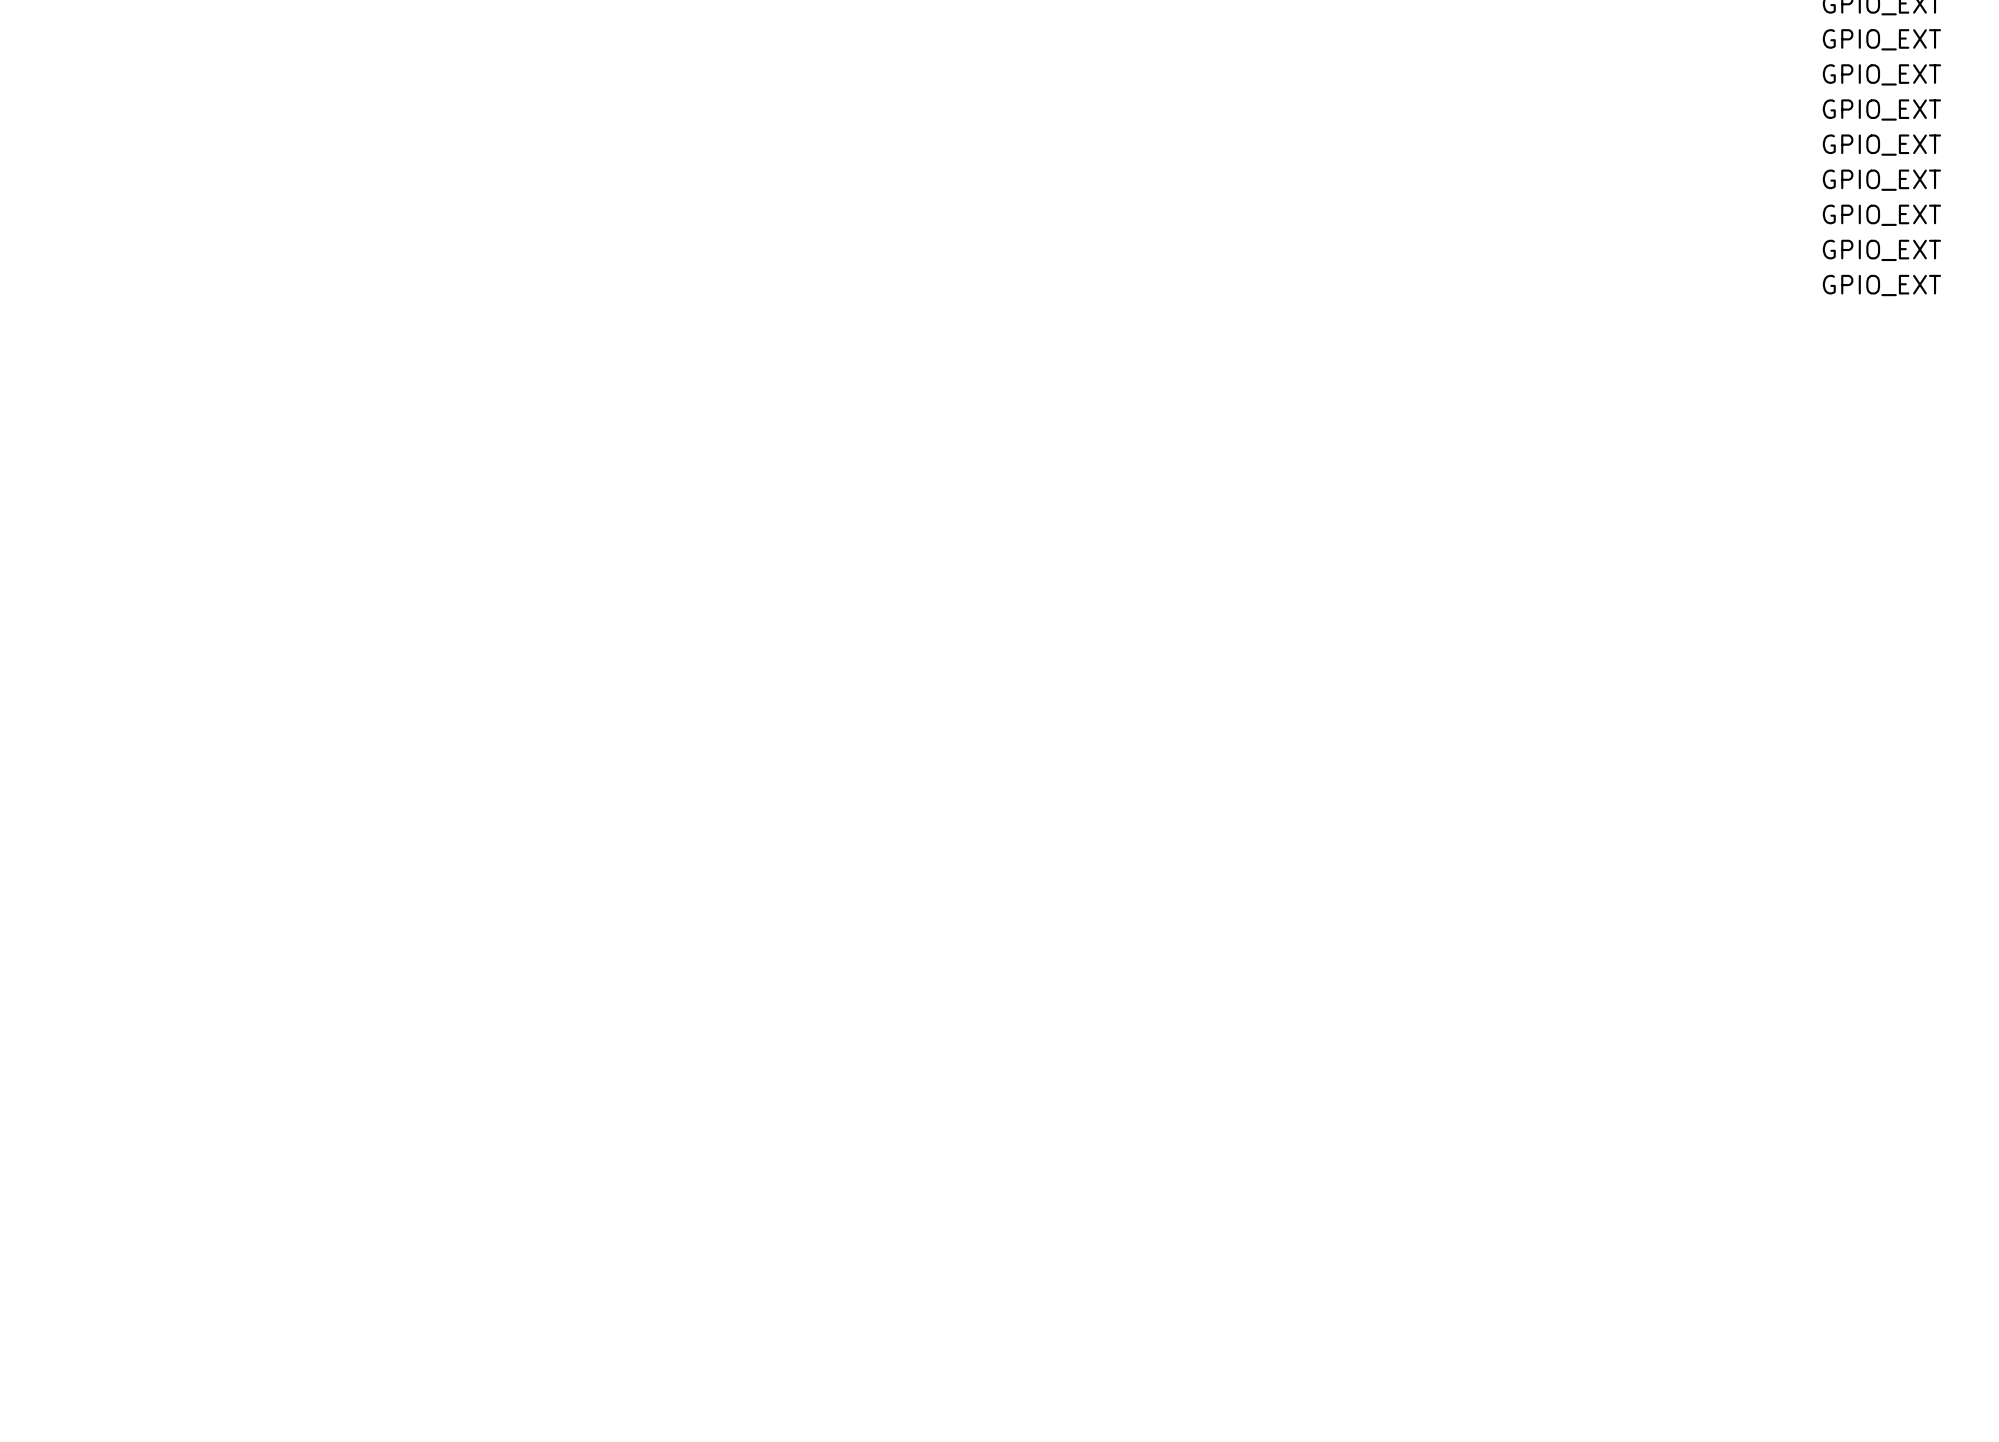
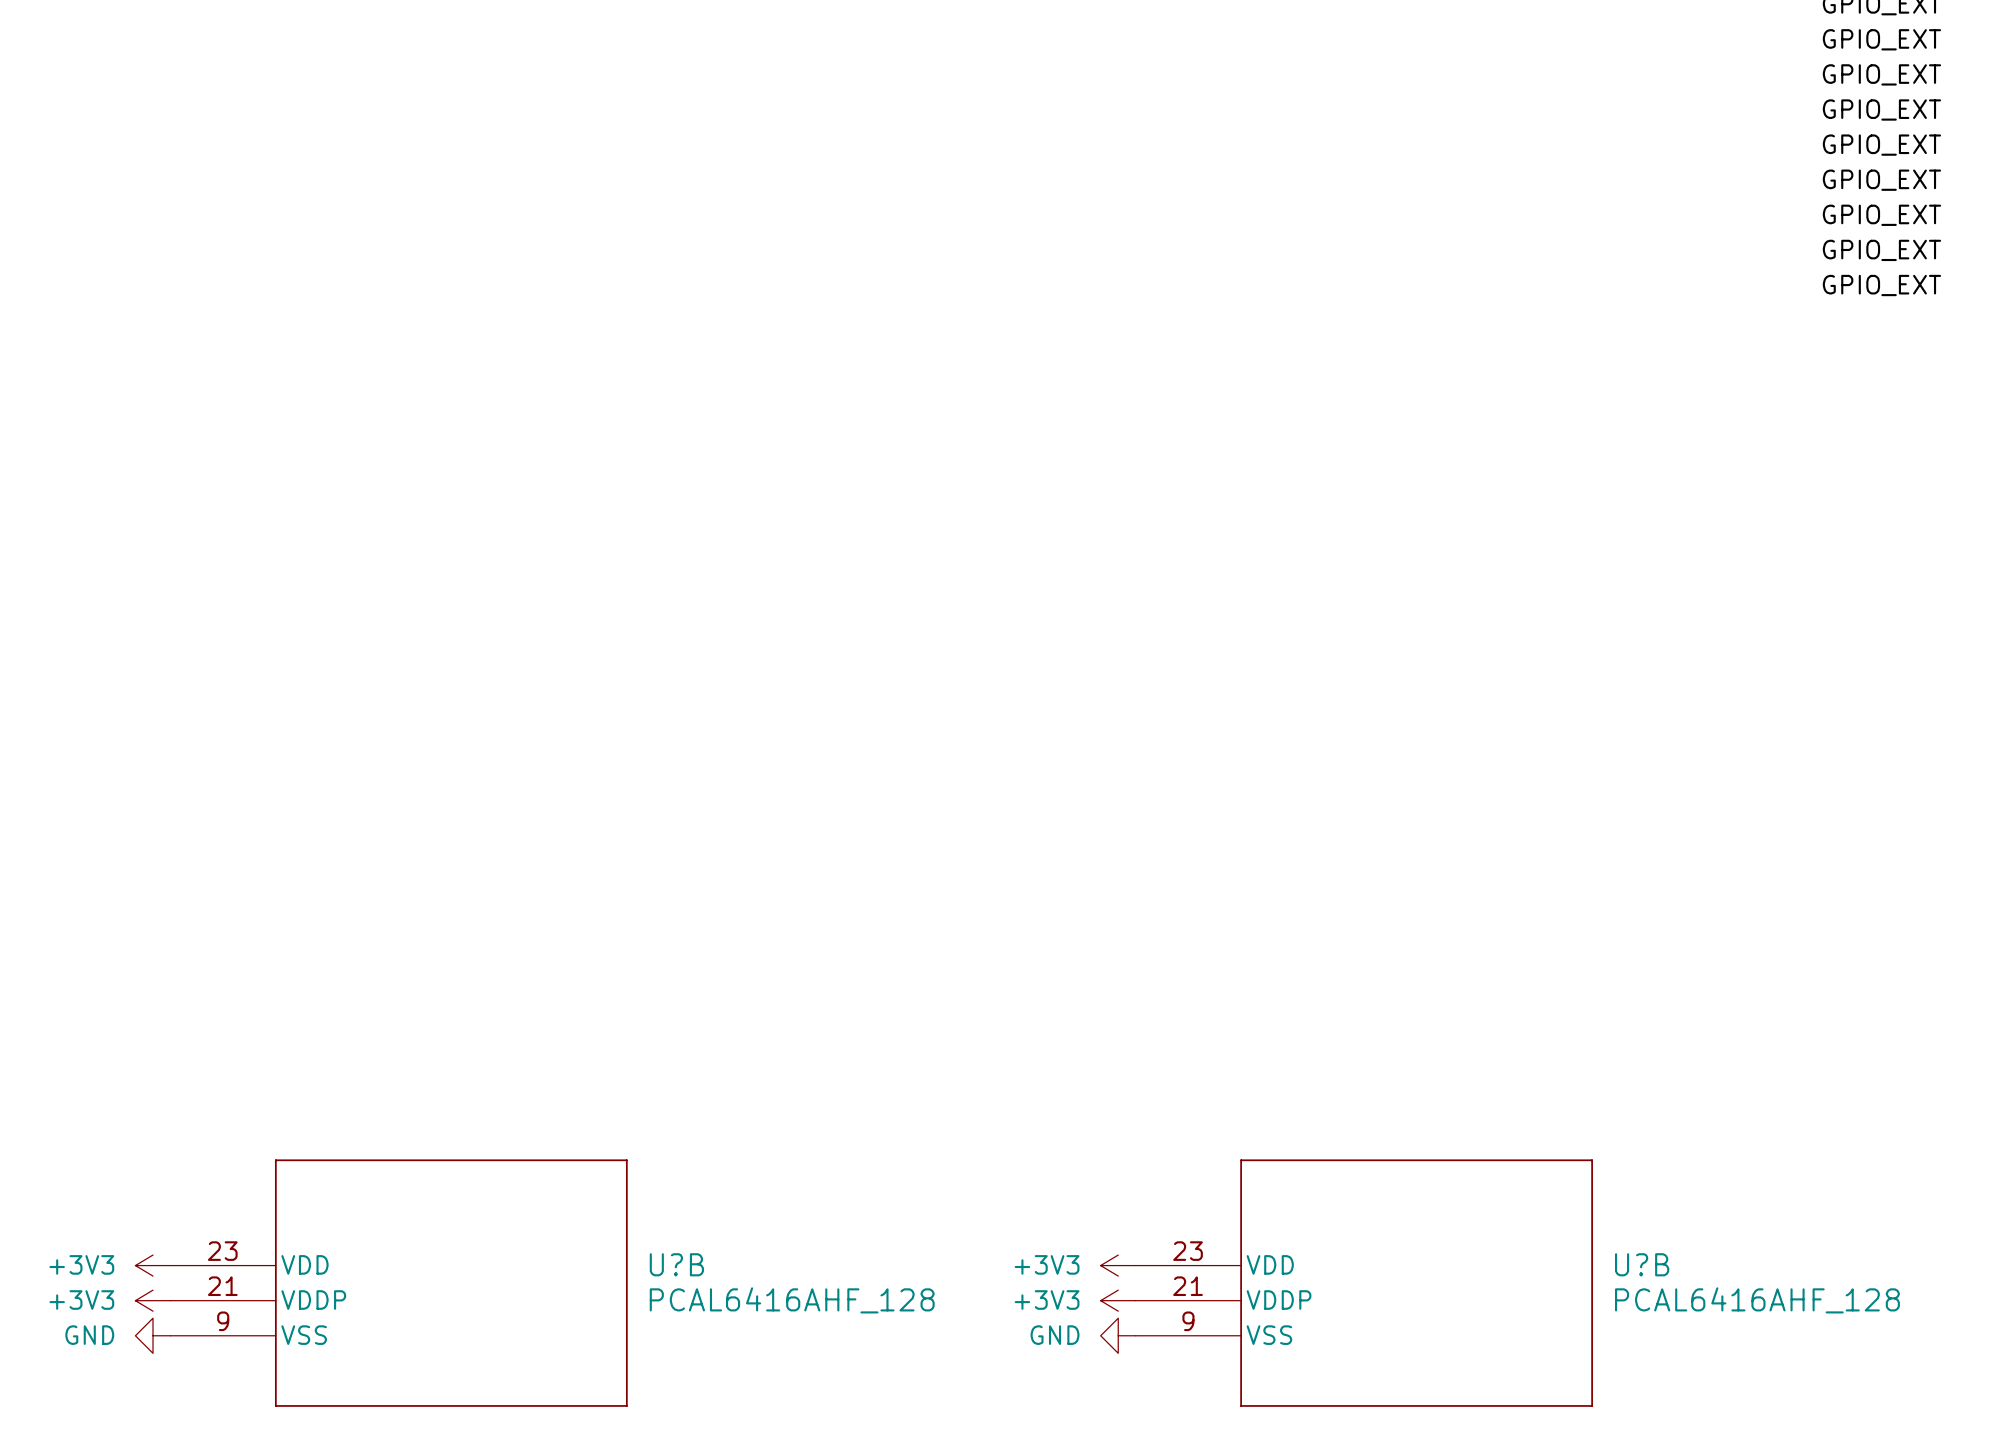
power symbol: none -> +3V3 (153, 1265)
power symbol: none -> +3V3 (1118, 1265)
U?B: none -> PCAL6416AHF_128 (399, 1283)
U?B: none -> PCAL6416AHF_128 (1364, 1283)
power symbol: none -> +3V3 (153, 1300)
power symbol: none -> +3V3 (1118, 1300)
power symbol: none -> GND (153, 1335)
power symbol: none -> GND (1118, 1335)

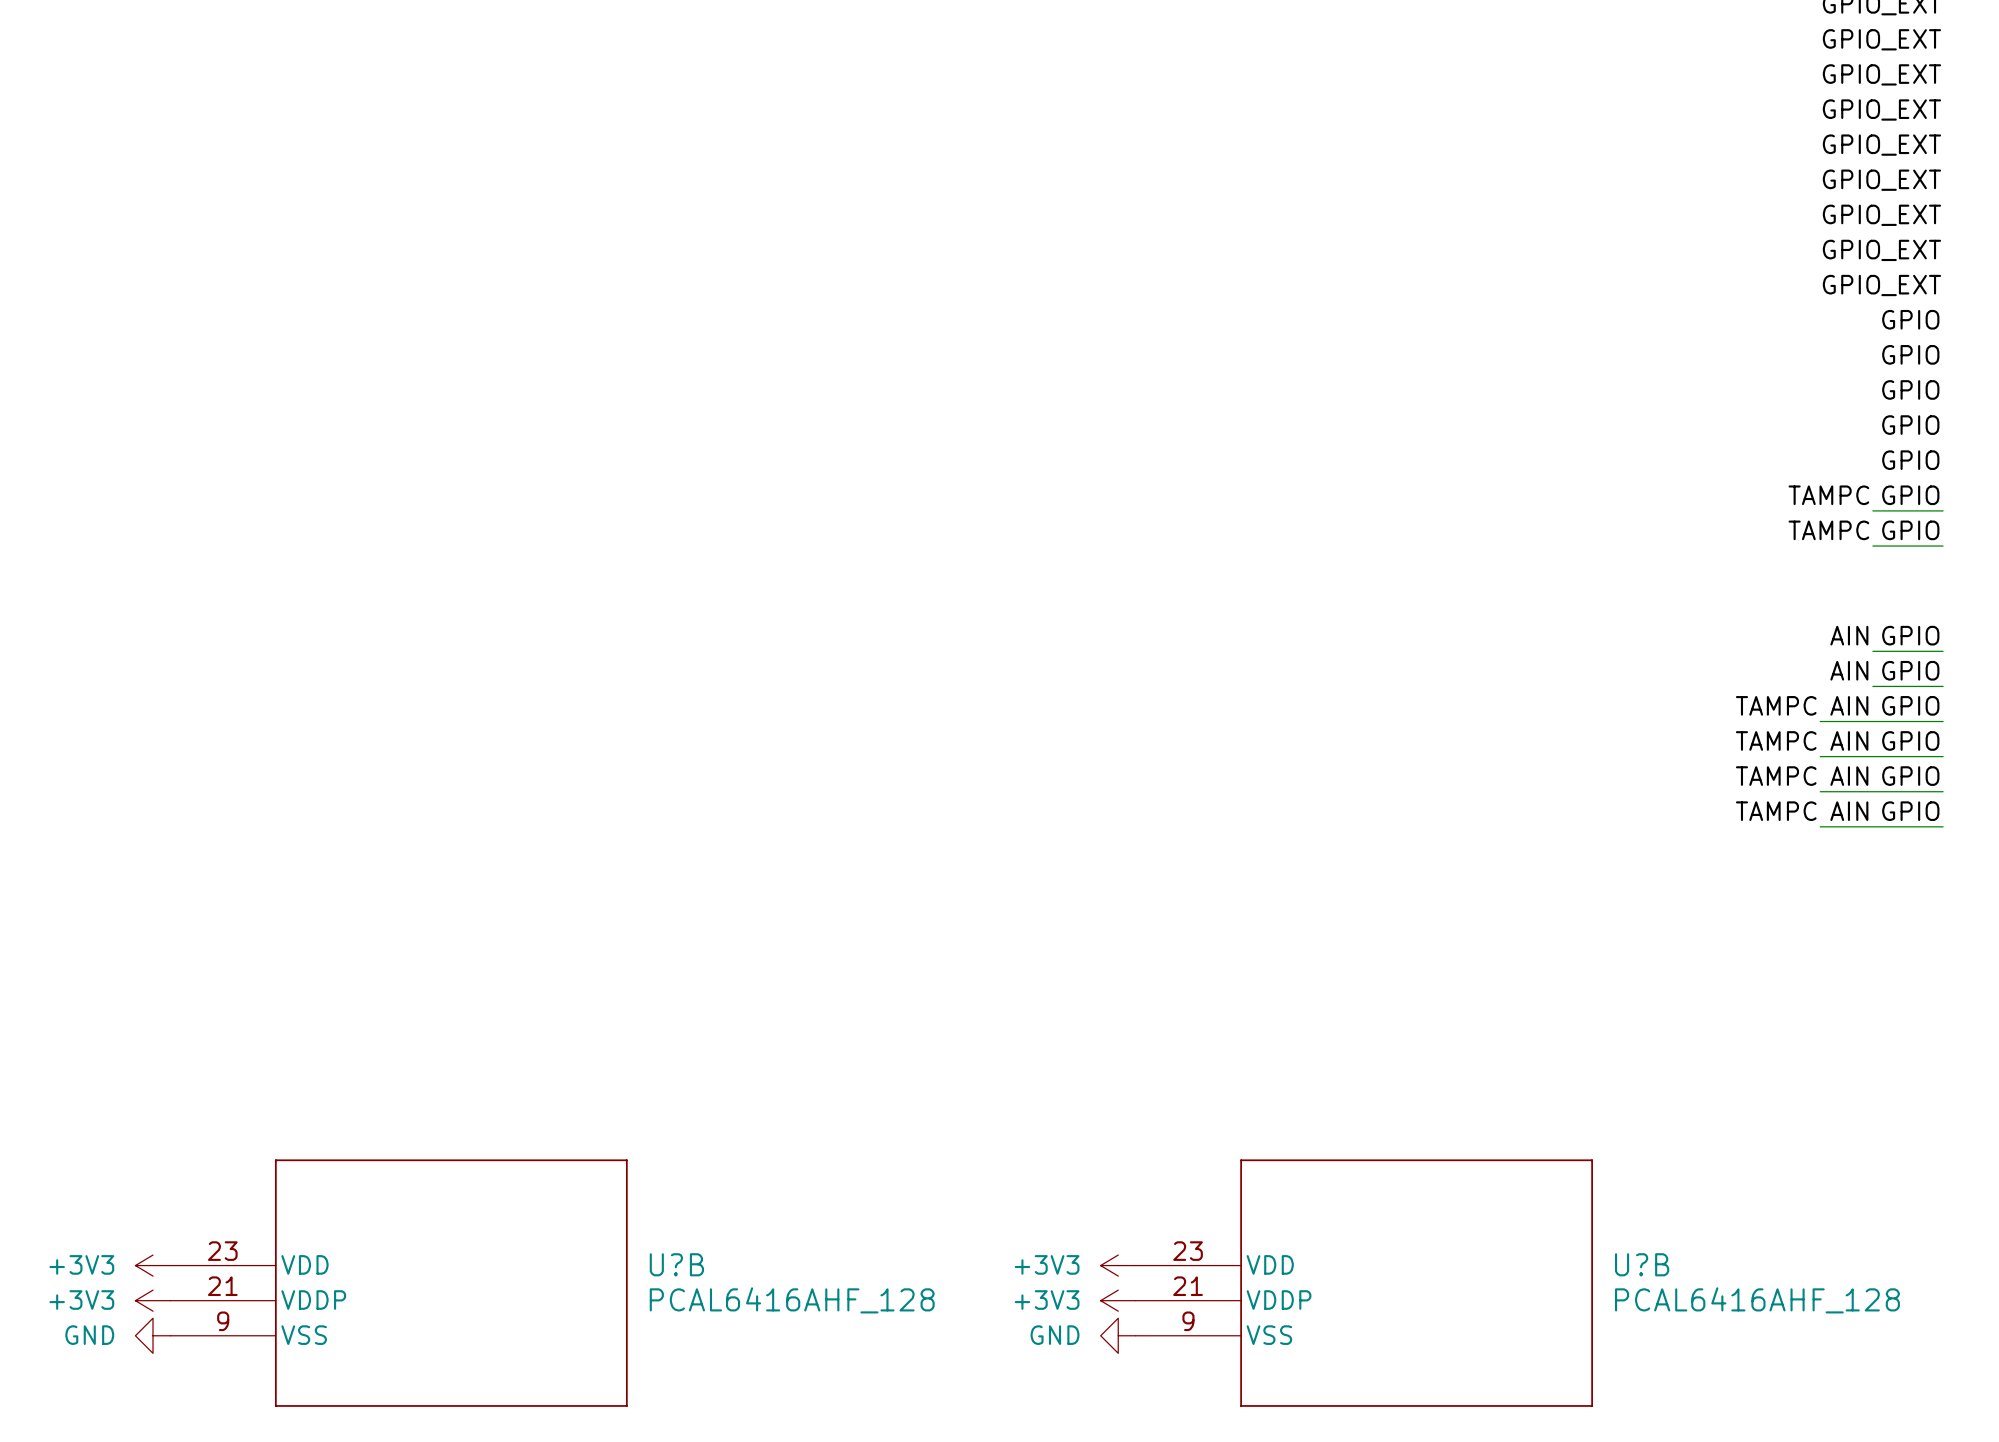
label: none -> GPIO (1910, 319)
label: none -> GPIO (1910, 354)
label: none -> GPIO (1910, 389)
label: none -> GPIO (1910, 425)
label: none -> GPIO (1910, 460)
label: none -> TAMPC (1828, 495)
label: none -> GPIO (1910, 495)
wire: none -> (1872, 510) (1943, 510)
label: none -> TAMPC (1828, 530)
label: none -> GPIO (1910, 530)
wire: none -> (1872, 546) (1943, 546)
label: none -> AIN (1849, 635)
label: none -> GPIO (1910, 635)
wire: none -> (1872, 651) (1943, 651)
label: none -> AIN (1849, 670)
label: none -> GPIO (1910, 670)
wire: none -> (1872, 686) (1943, 686)
label: none -> TAMPC (1776, 705)
label: none -> AIN (1849, 705)
label: none -> GPIO (1910, 705)
wire: none -> (1820, 721) (1943, 721)
label: none -> TAMPC (1776, 740)
label: none -> AIN (1849, 740)
label: none -> GPIO (1910, 740)
wire: none -> (1820, 756) (1943, 756)
label: none -> TAMPC (1776, 776)
label: none -> AIN (1849, 776)
label: none -> GPIO (1910, 776)
wire: none -> (1820, 791) (1943, 791)
label: none -> TAMPC (1776, 811)
label: none -> AIN (1849, 811)
label: none -> GPIO (1910, 811)
wire: none -> (1820, 826) (1943, 826)

